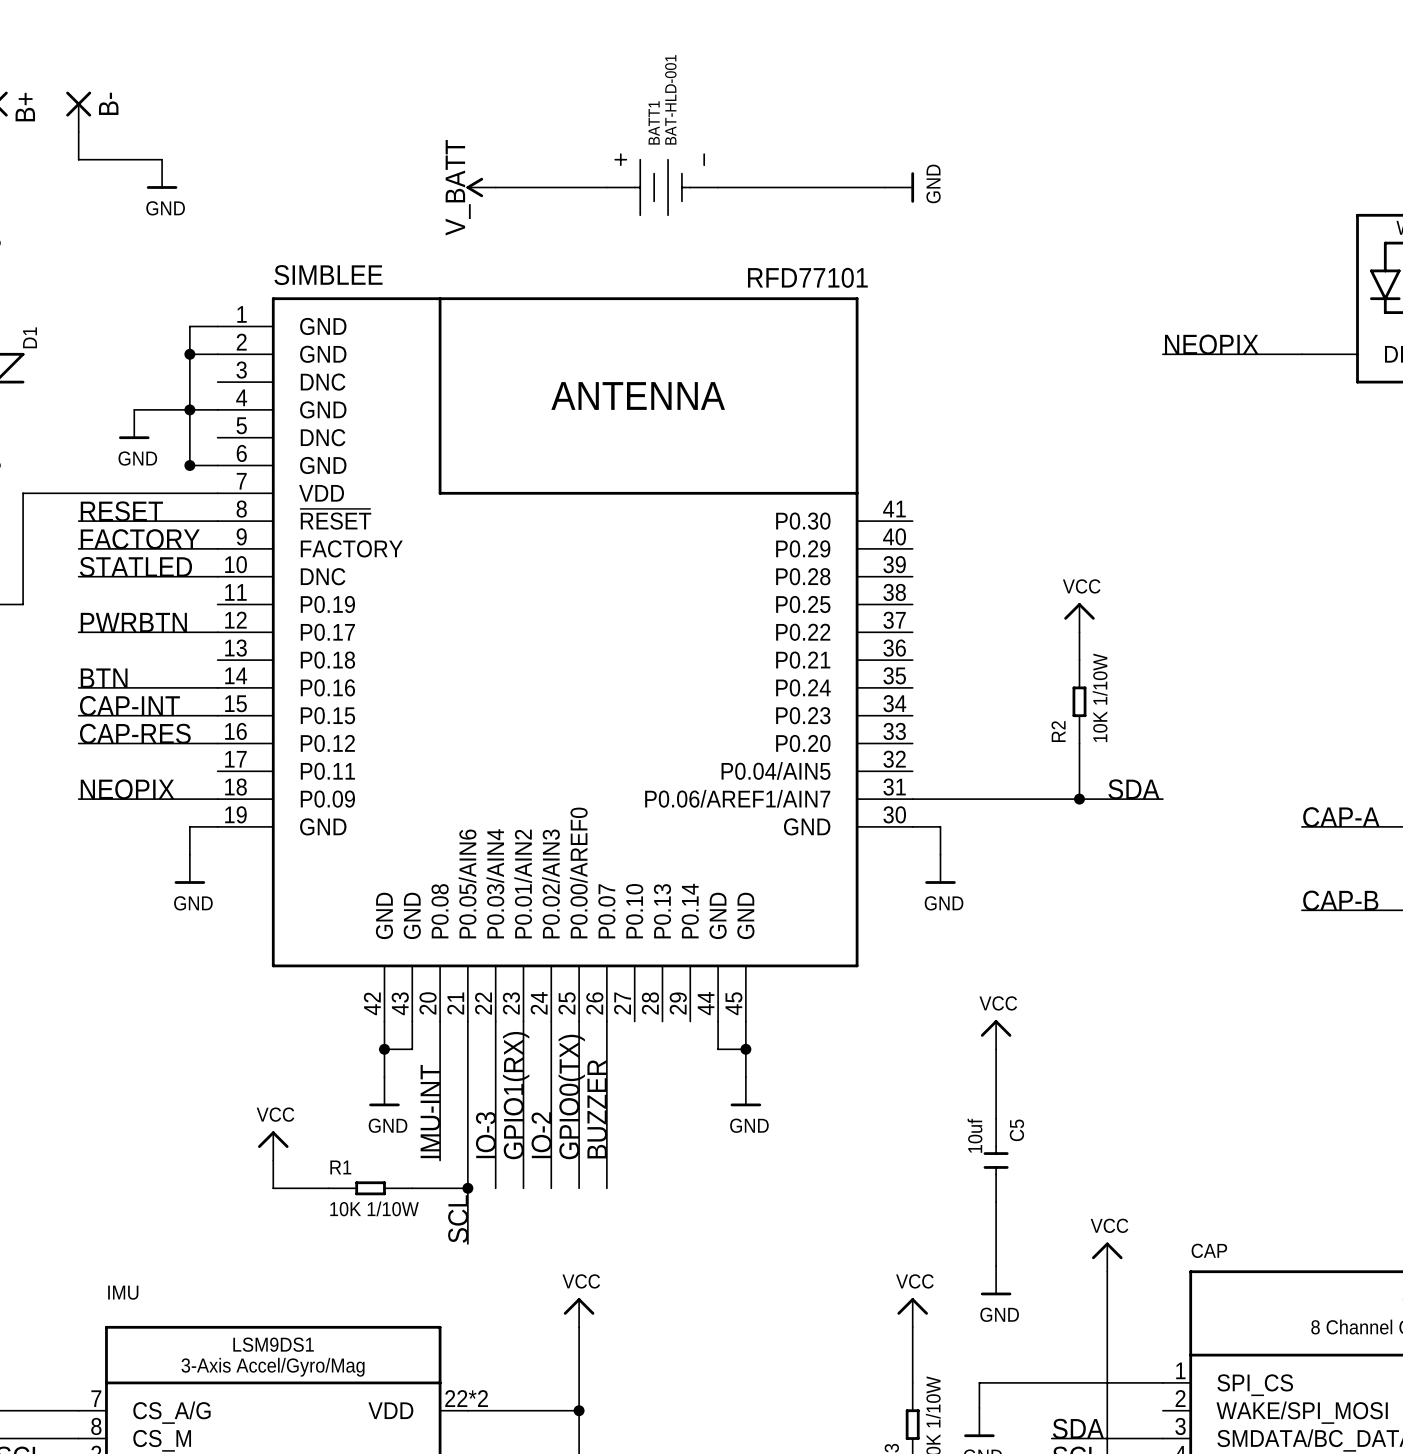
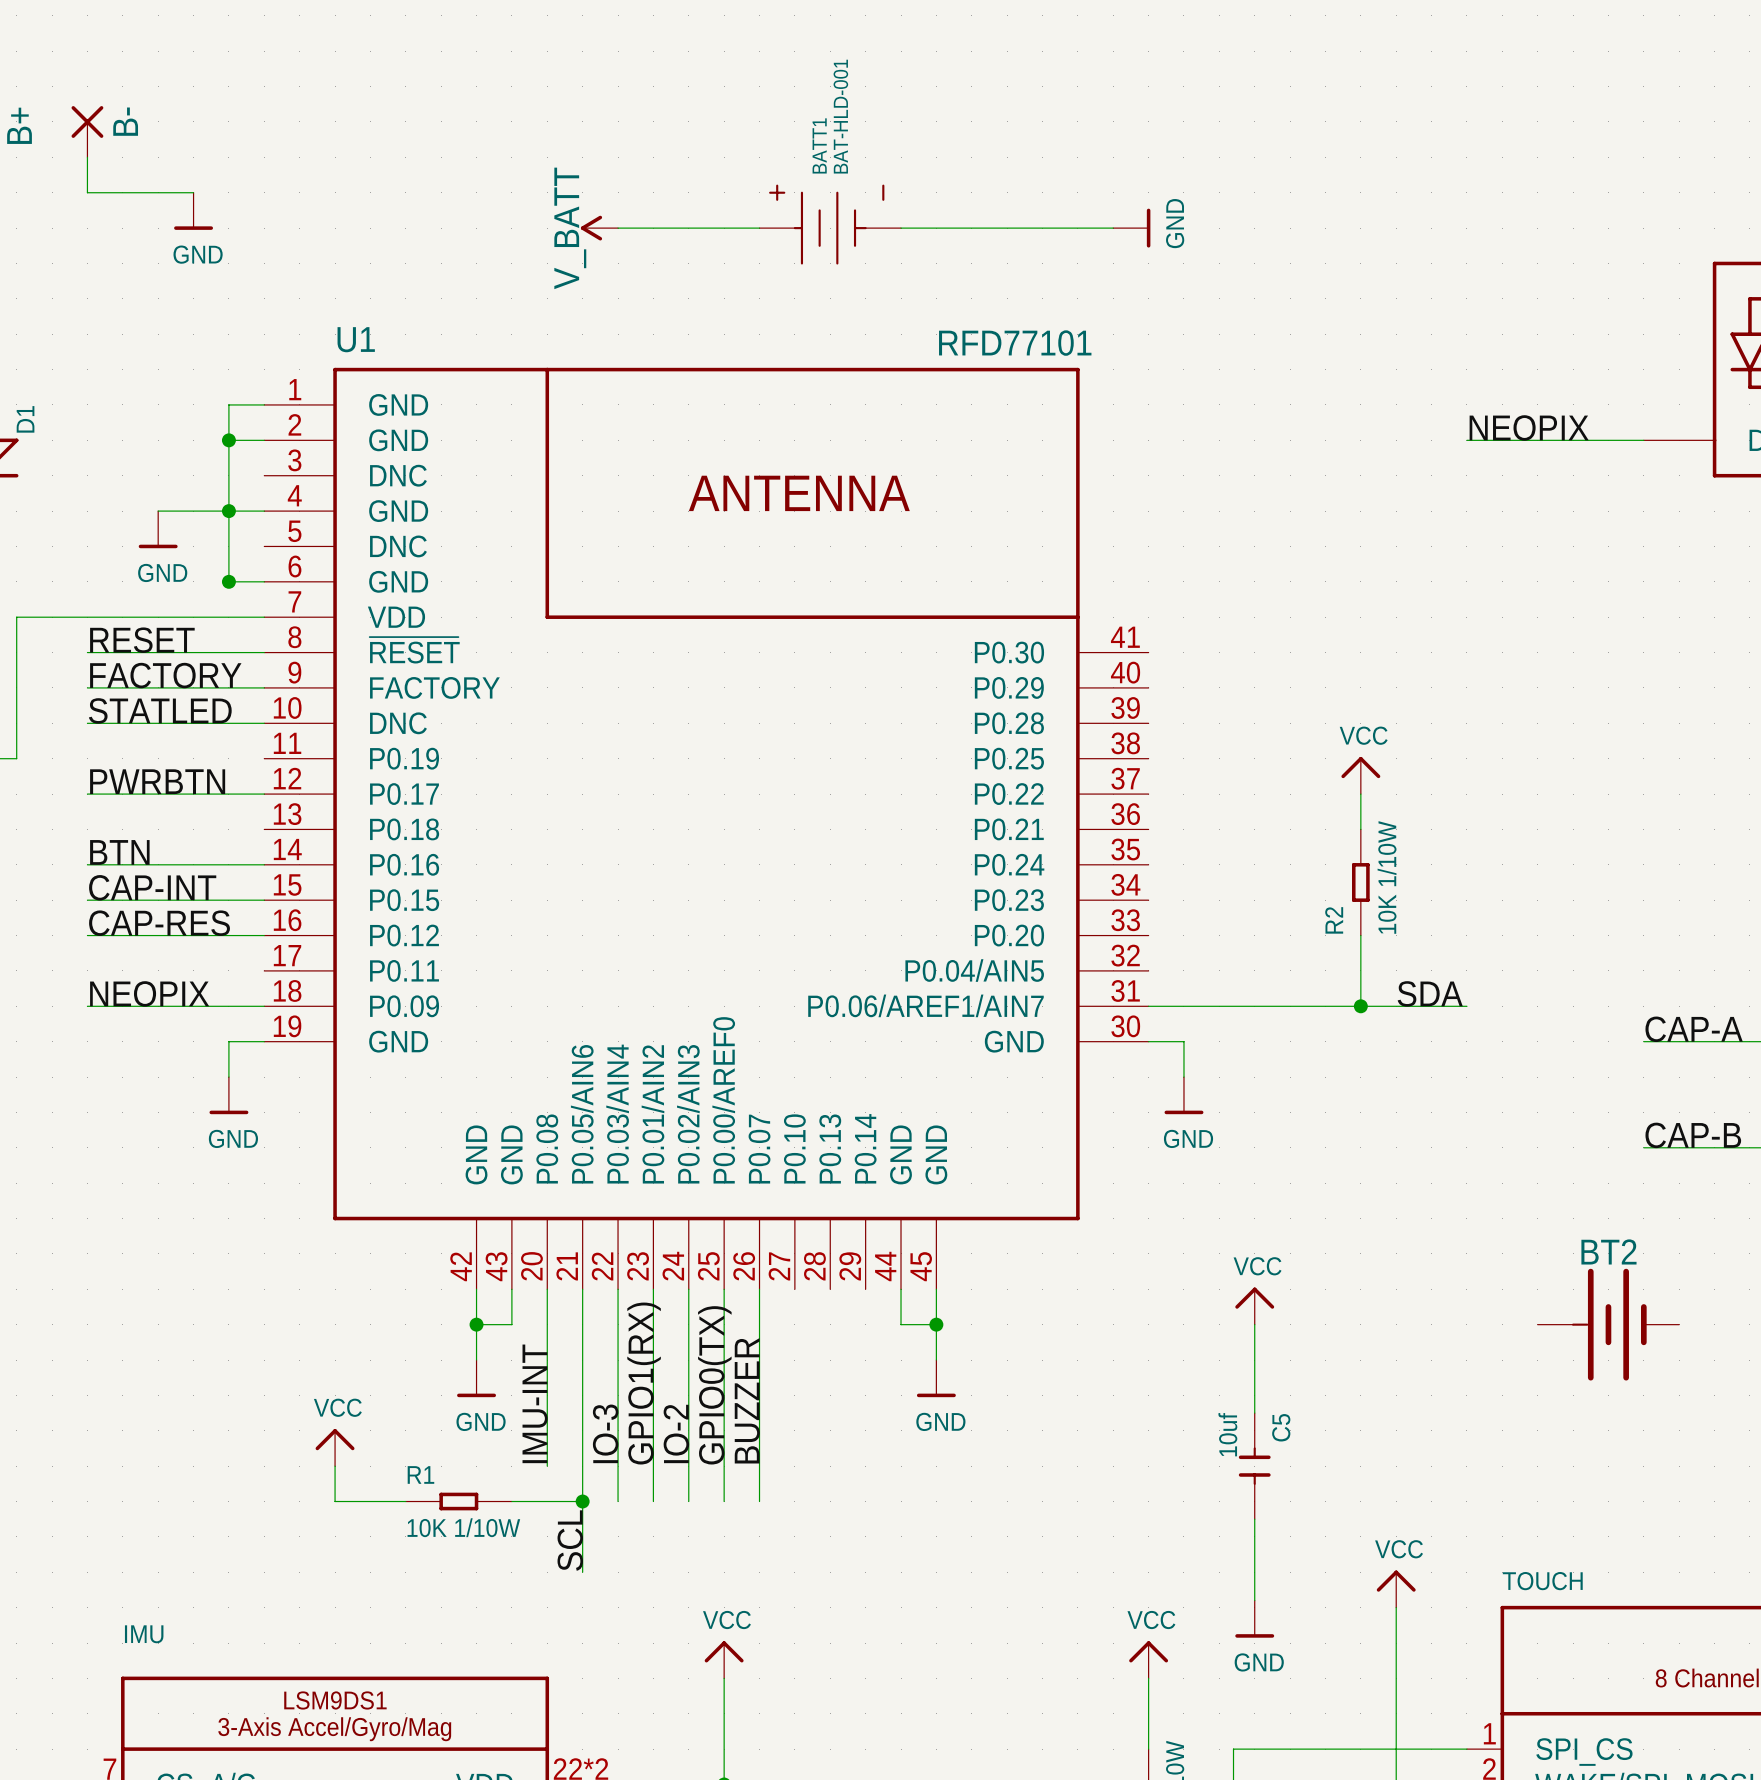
SIMBLEE name: SIMBLEE (328, 275) -> U1 (356, 339)
BT2: none -> (1608, 1324)
CAP name: CAP (1209, 1250) -> TOUCH (1542, 1581)

